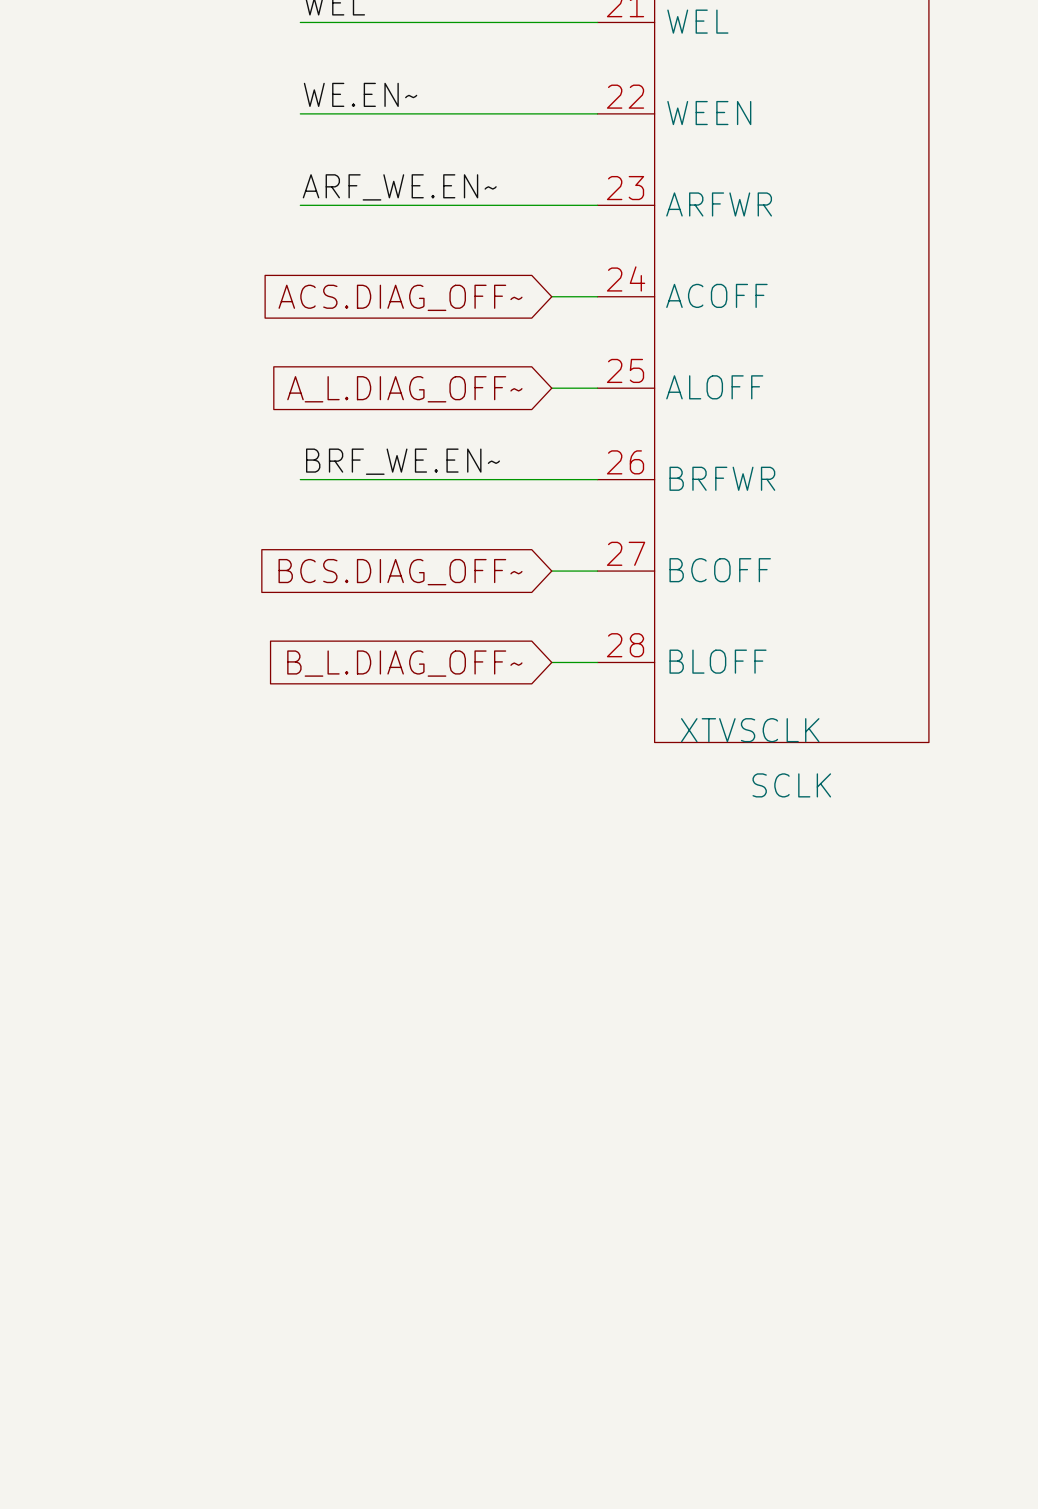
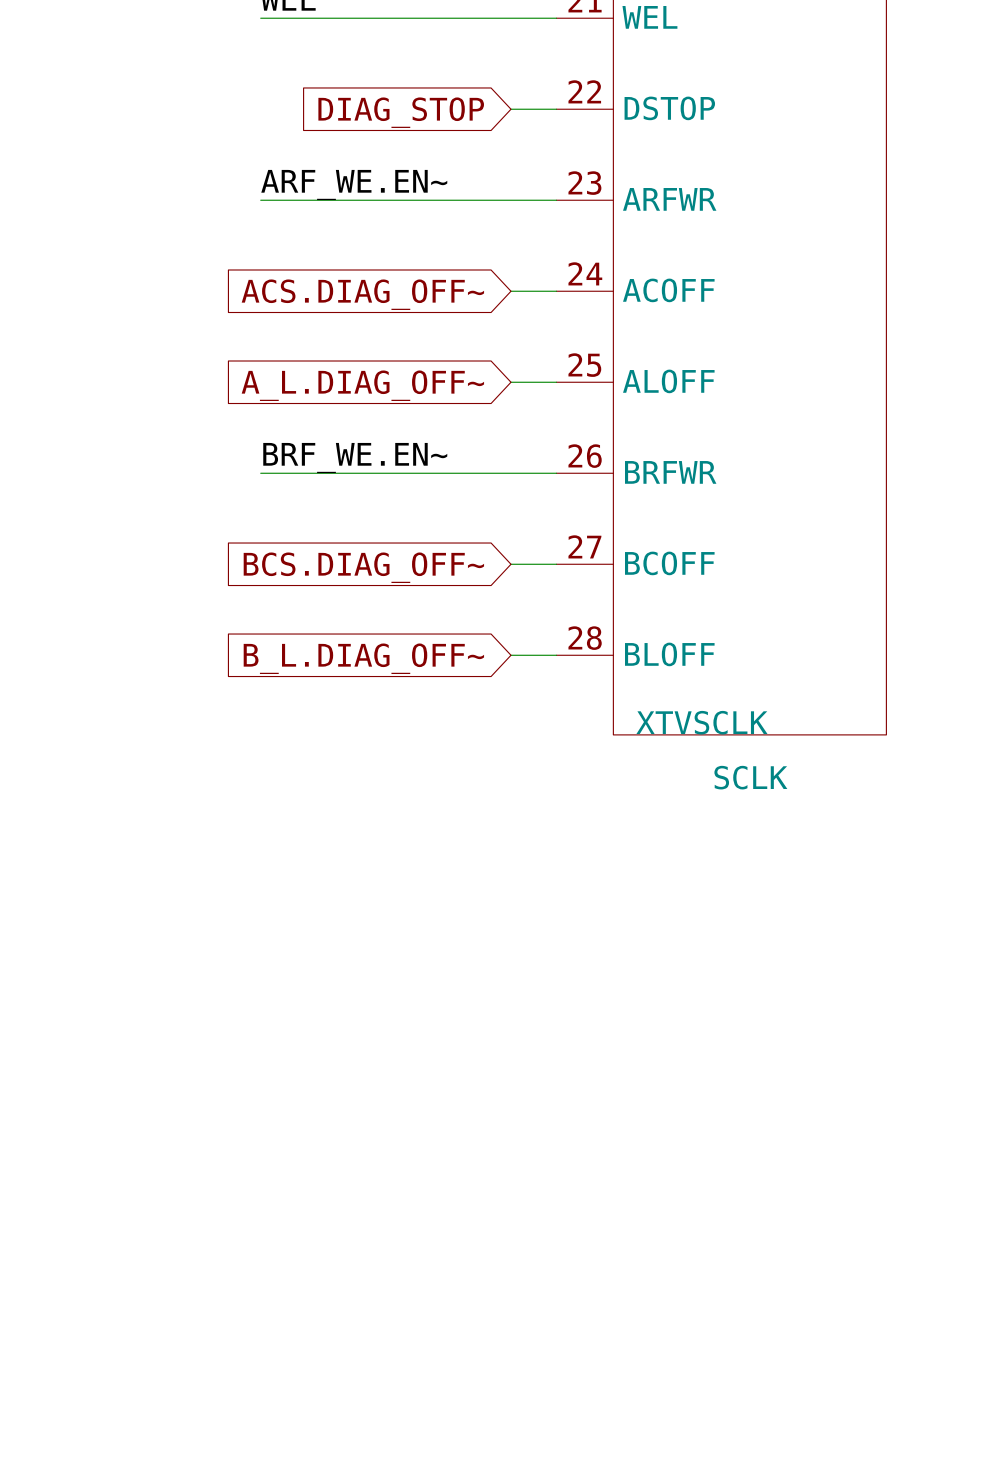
label: WE.EN~ (360, 94) -> none
wire: (300, 113) (551, 113) -> none
part pin name: WEEN (709, 113) -> DSTOP (669, 108)
global label: none -> DIAG_STOP (401, 112)

